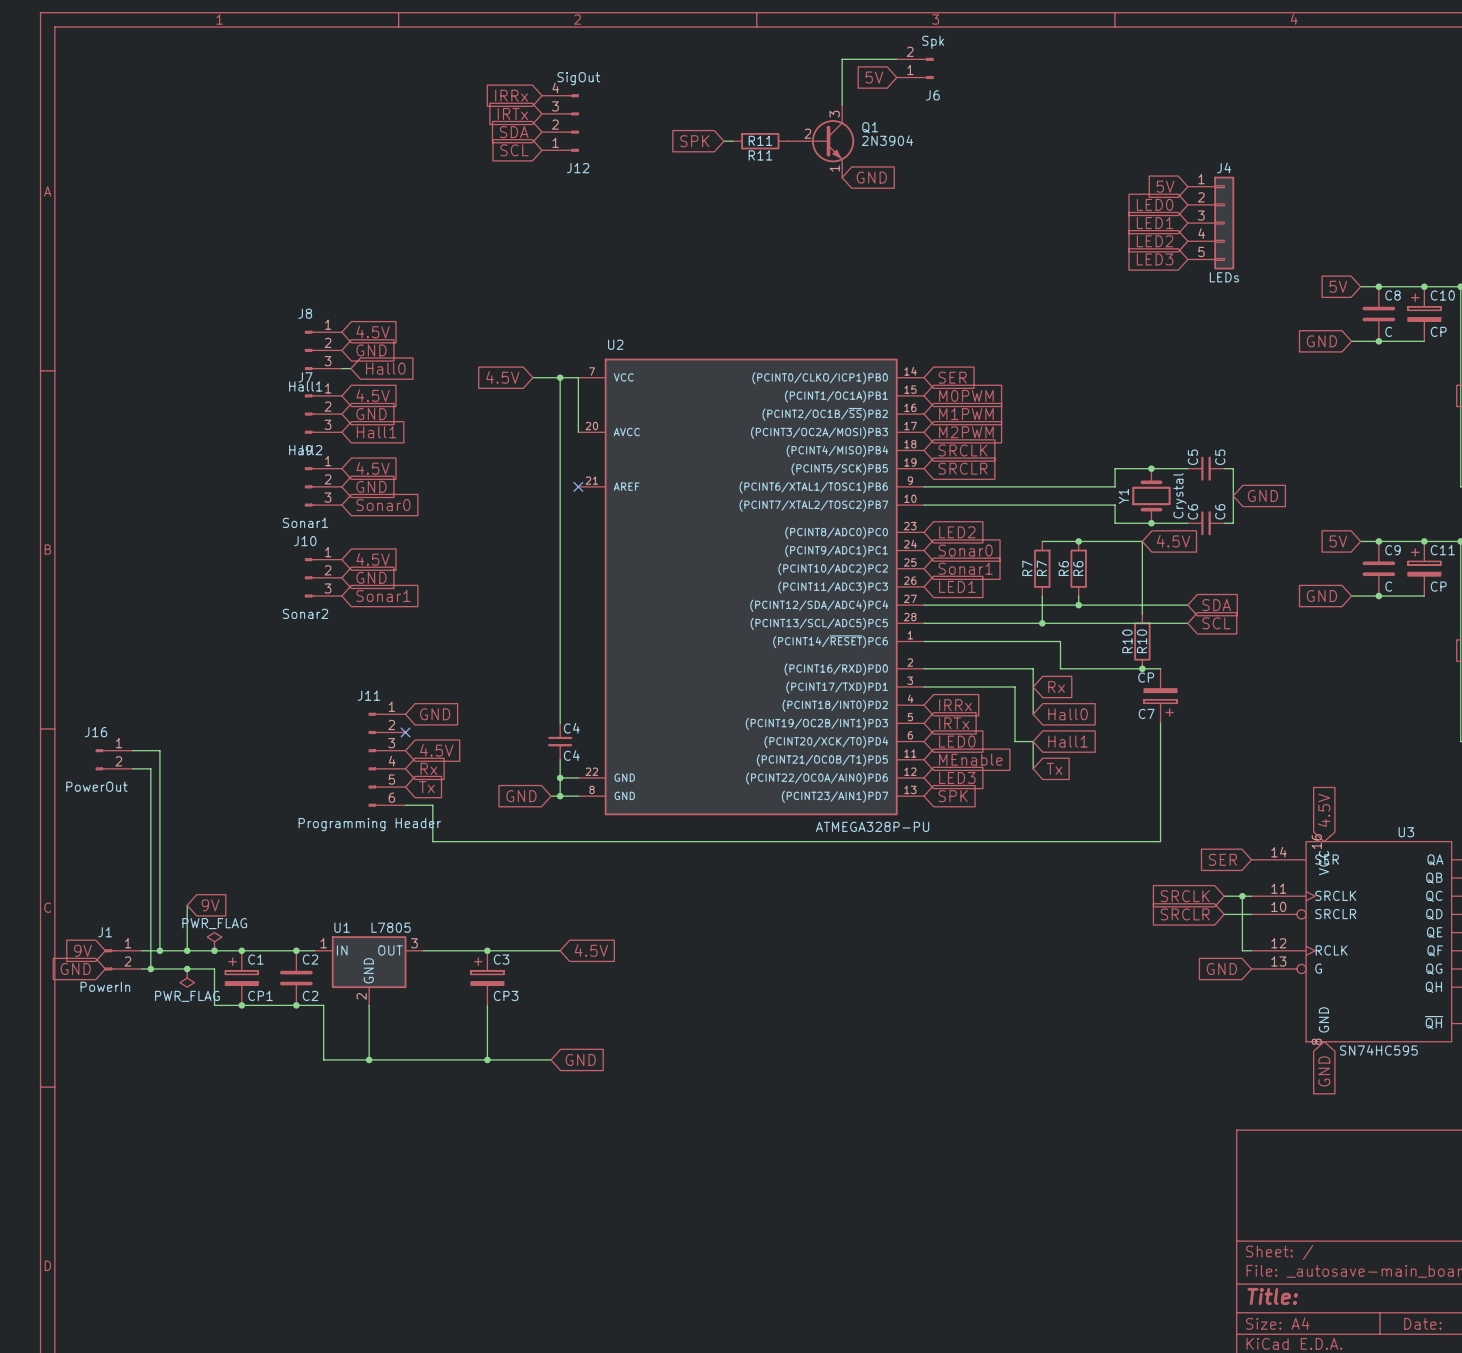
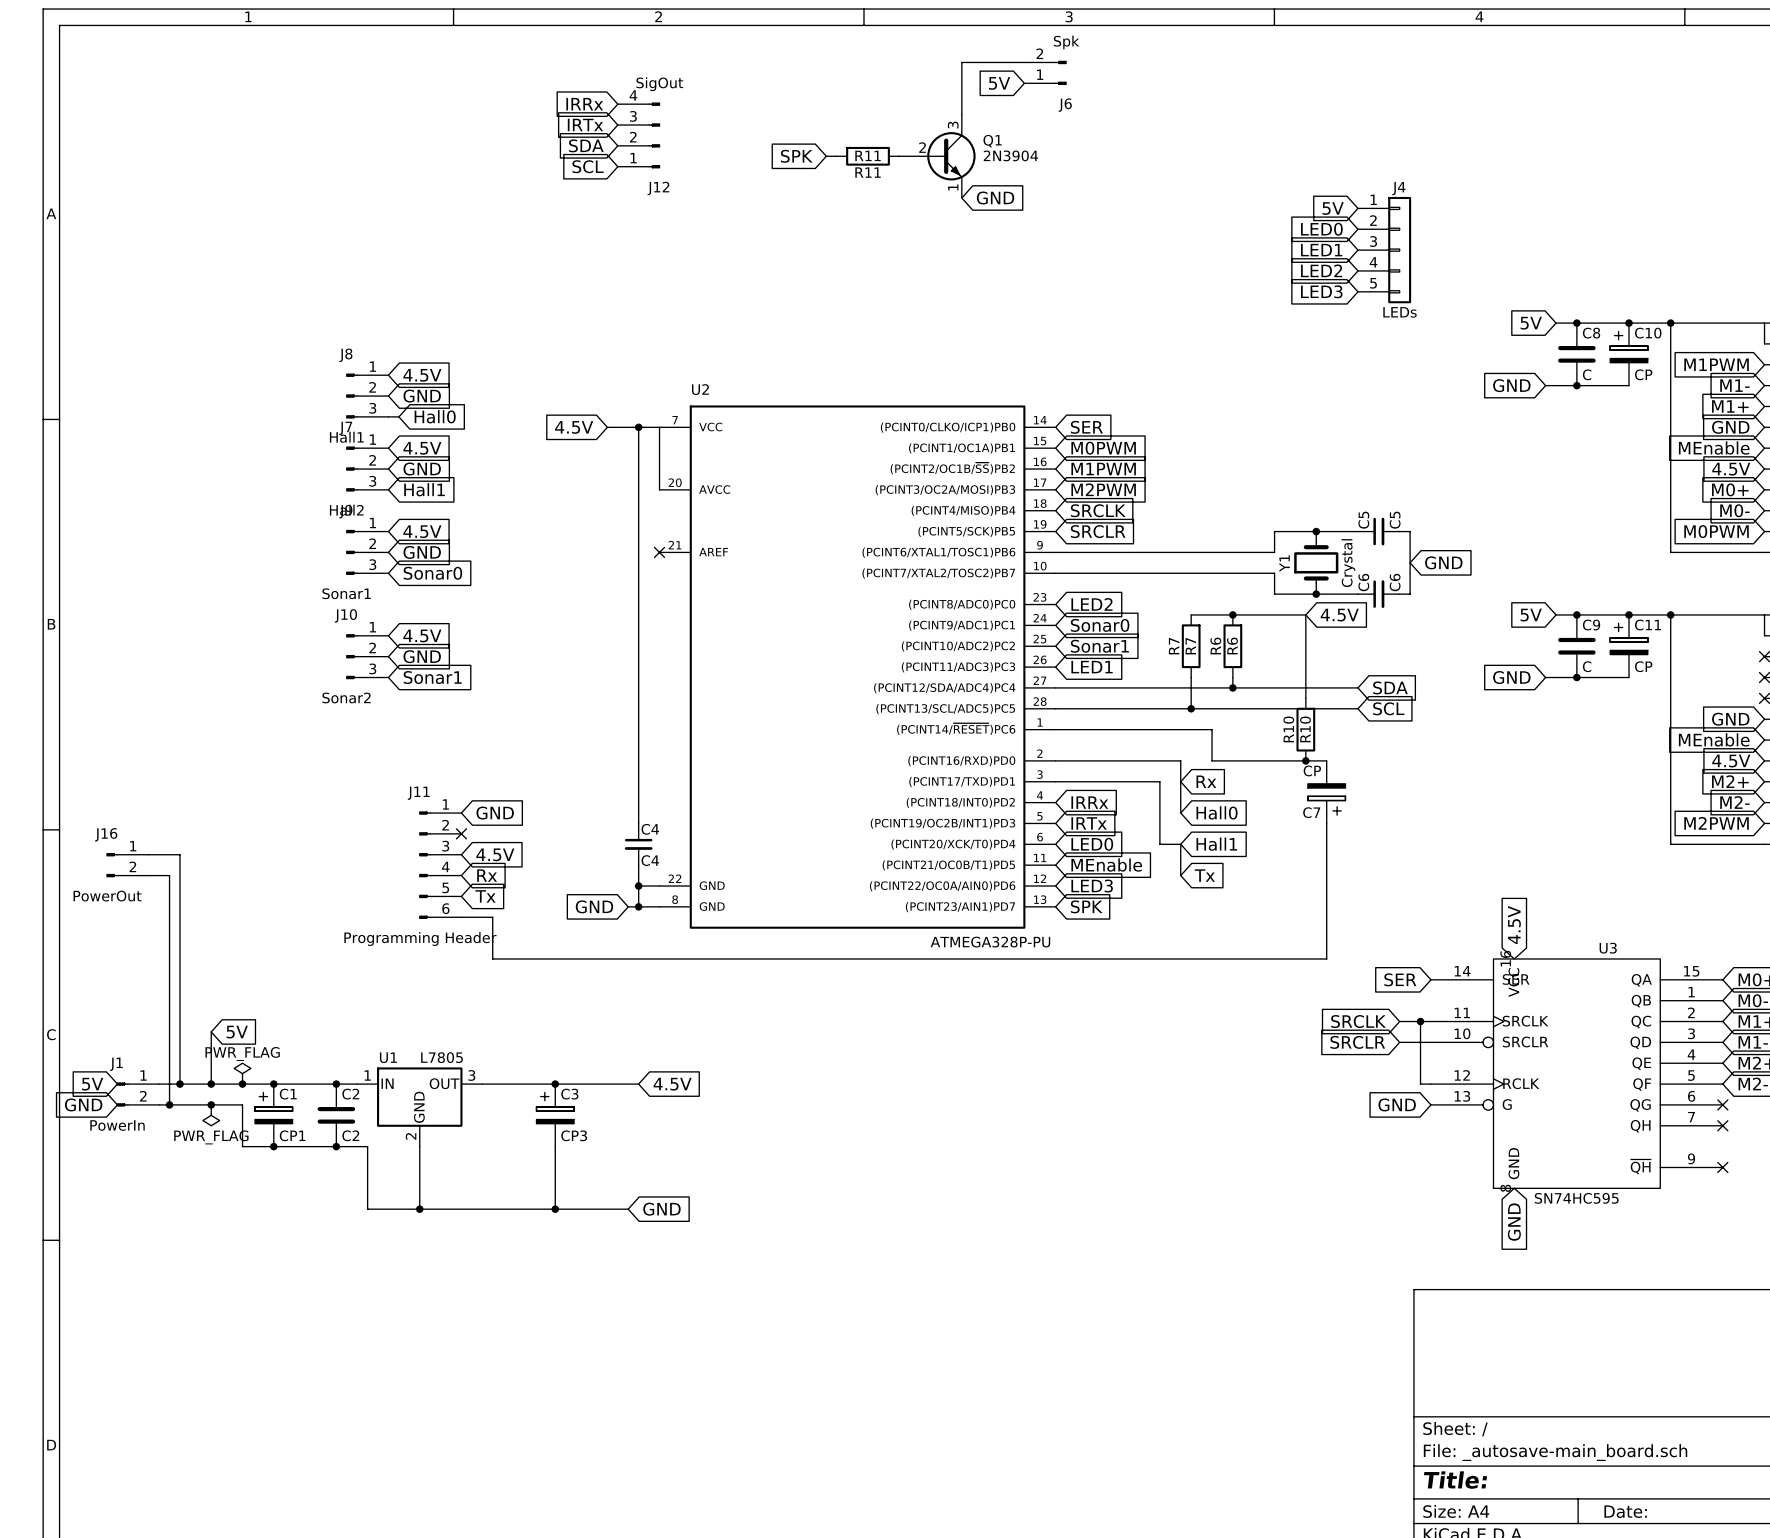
global label: 9V (210, 905) -> 5V (237, 1032)
global label: 9V (82, 950) -> 5V (92, 1084)

